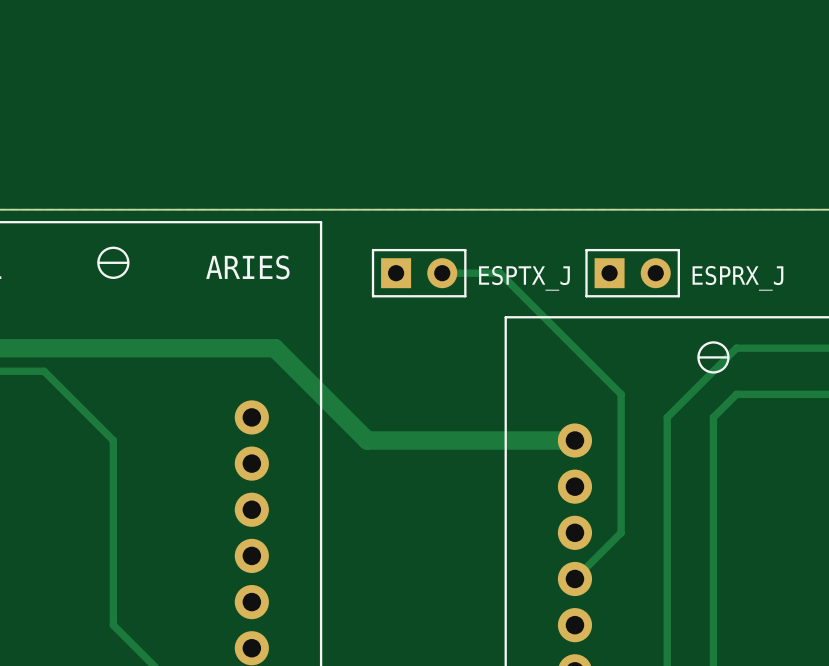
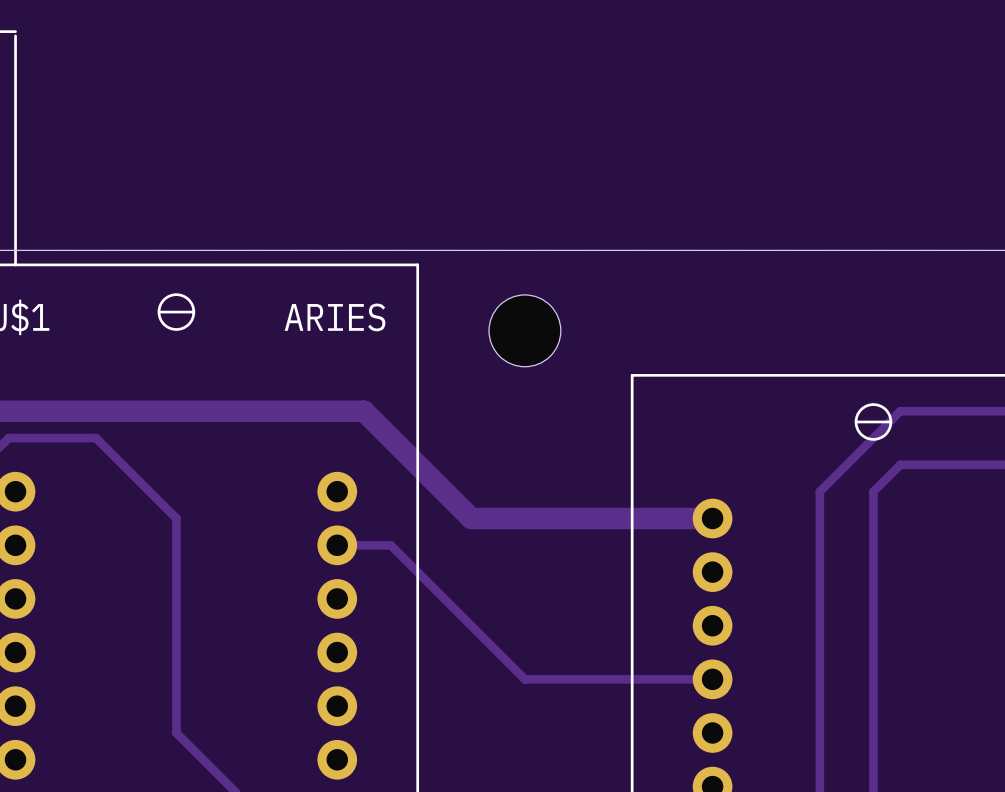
ESPTX_J: (419, 273) -> none
track: (442, 273) (499, 273) (621, 394) (621, 532) (574, 578) -> (337, 545) (390, 545) (524, 679) (712, 679)
ESPRX_J: (632, 273) -> none
hole: none -> (524, 330)

